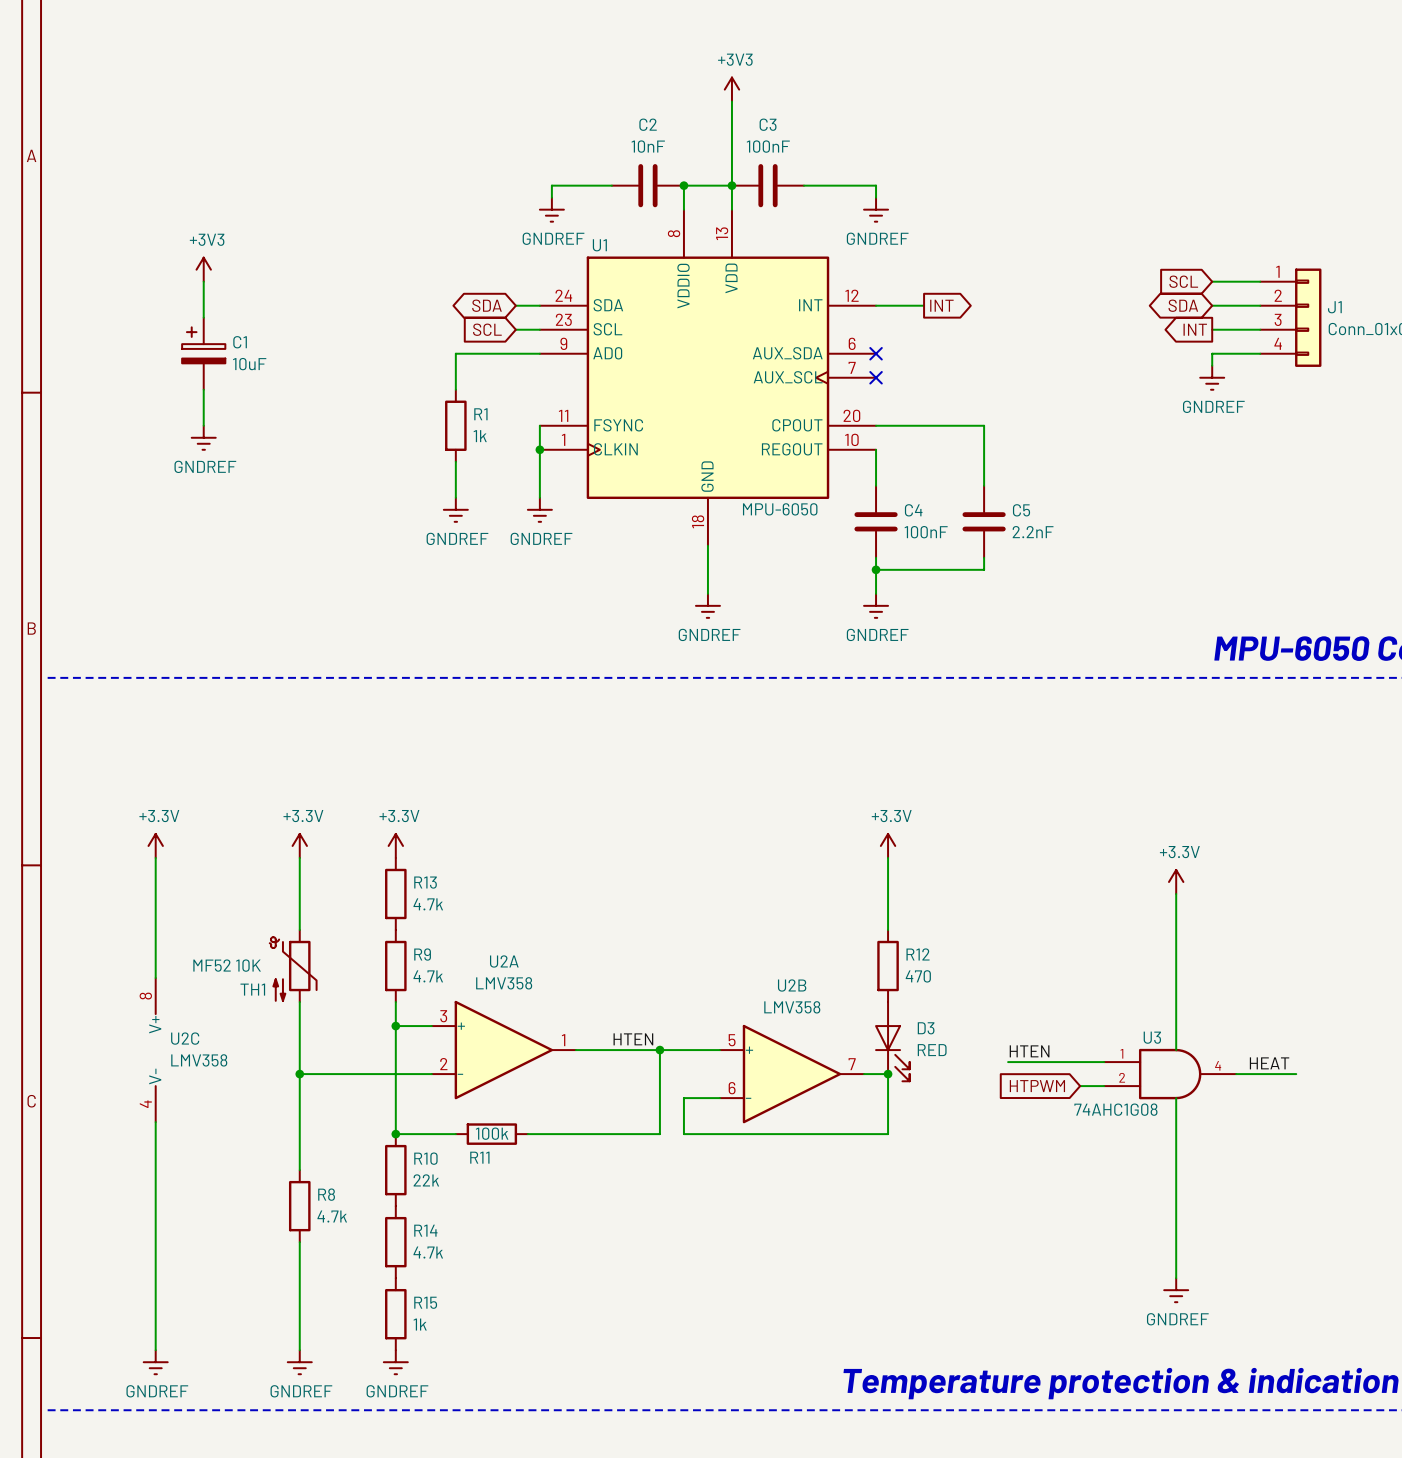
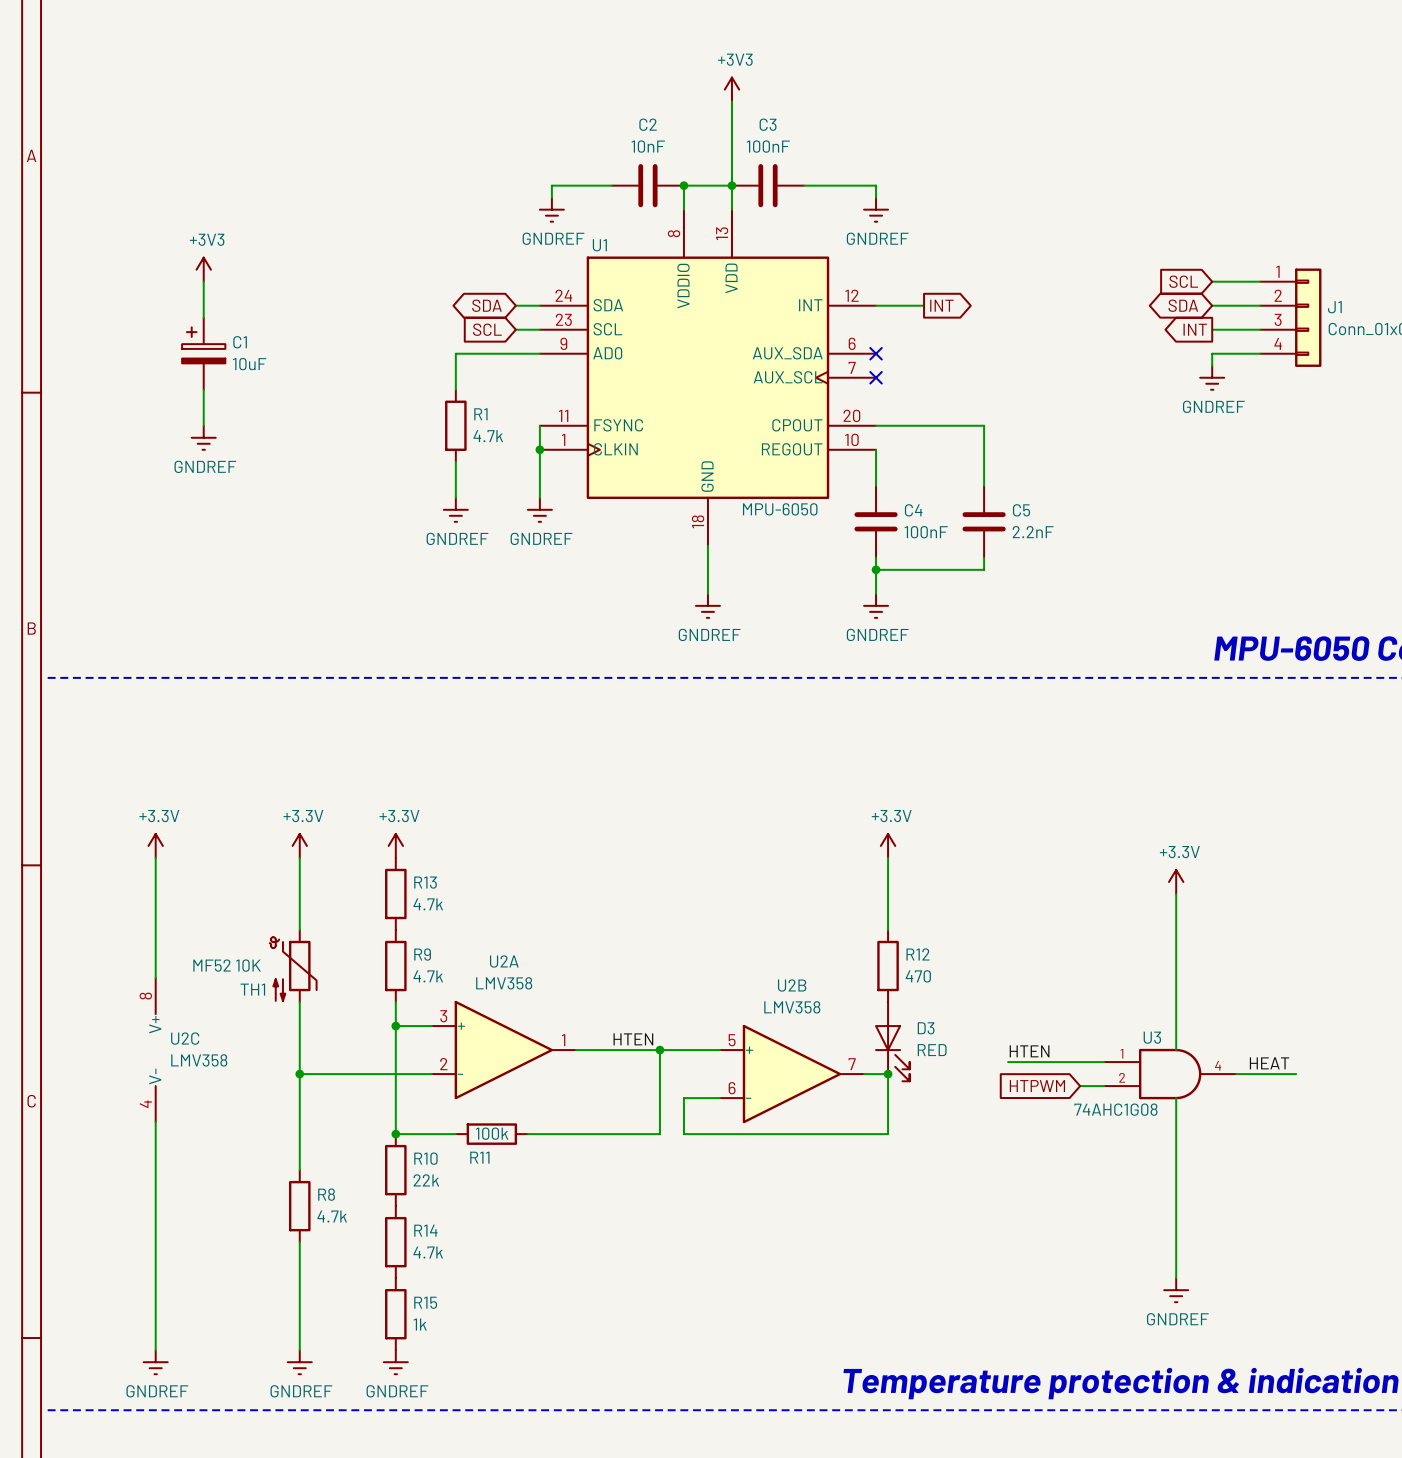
R1 value: 1k (480, 436) -> 4.7k (488, 436)

